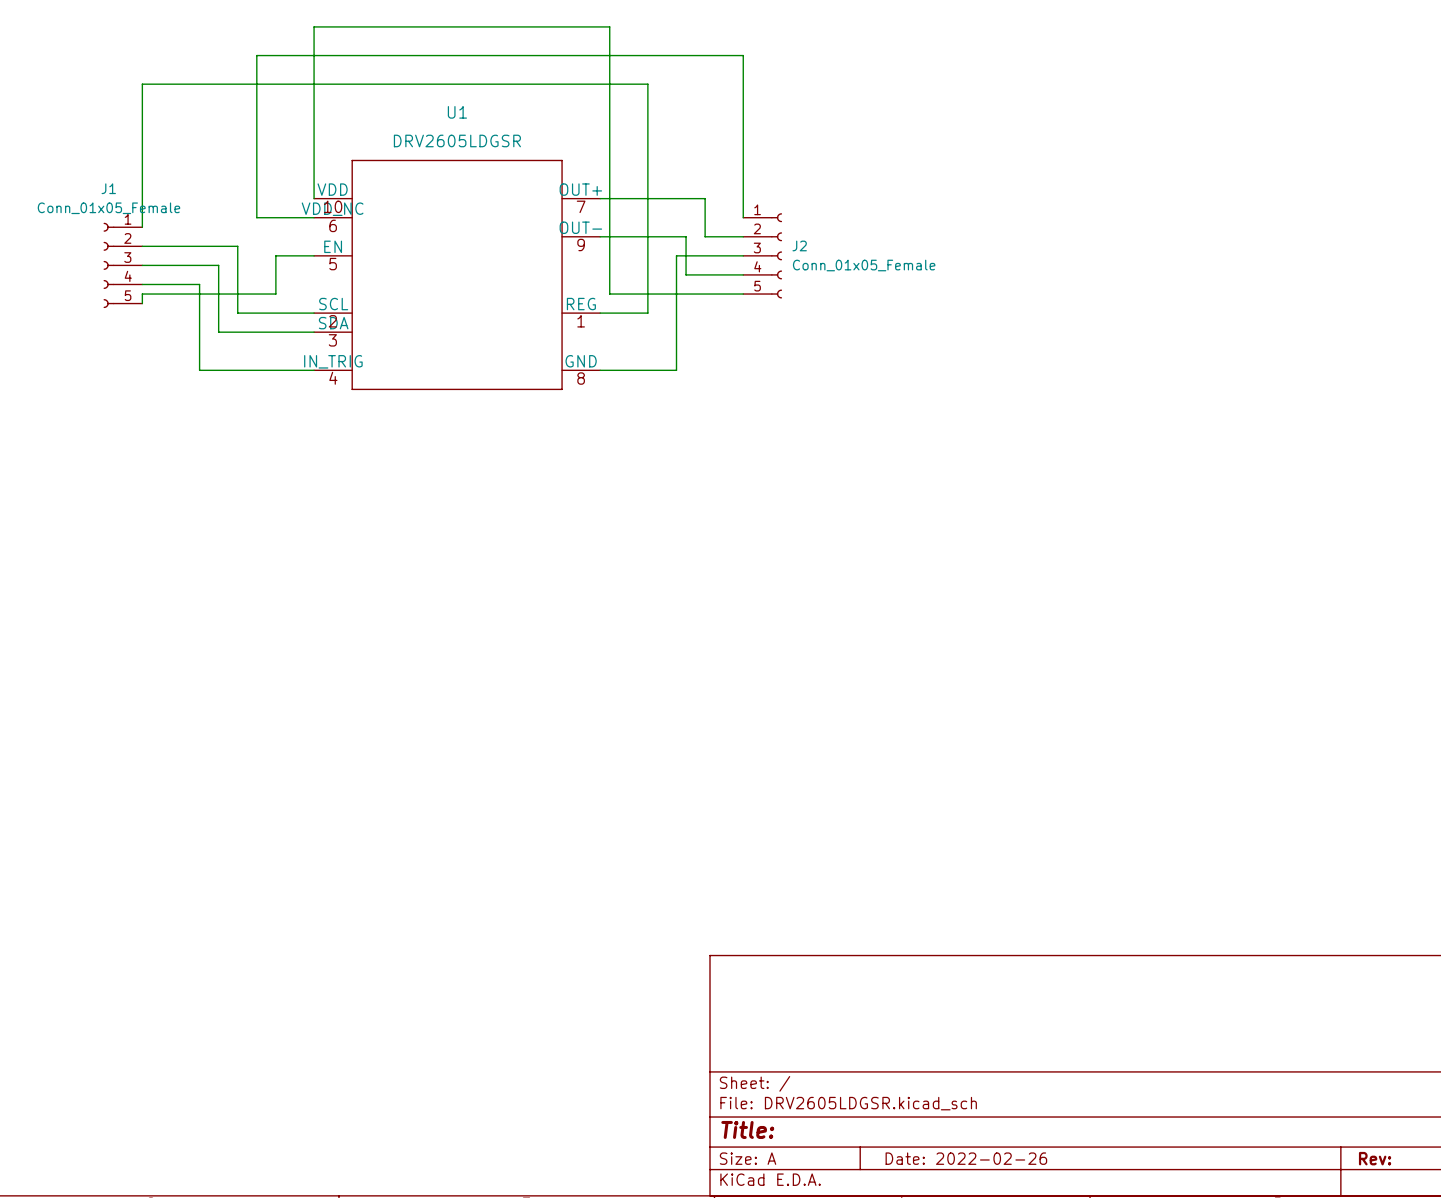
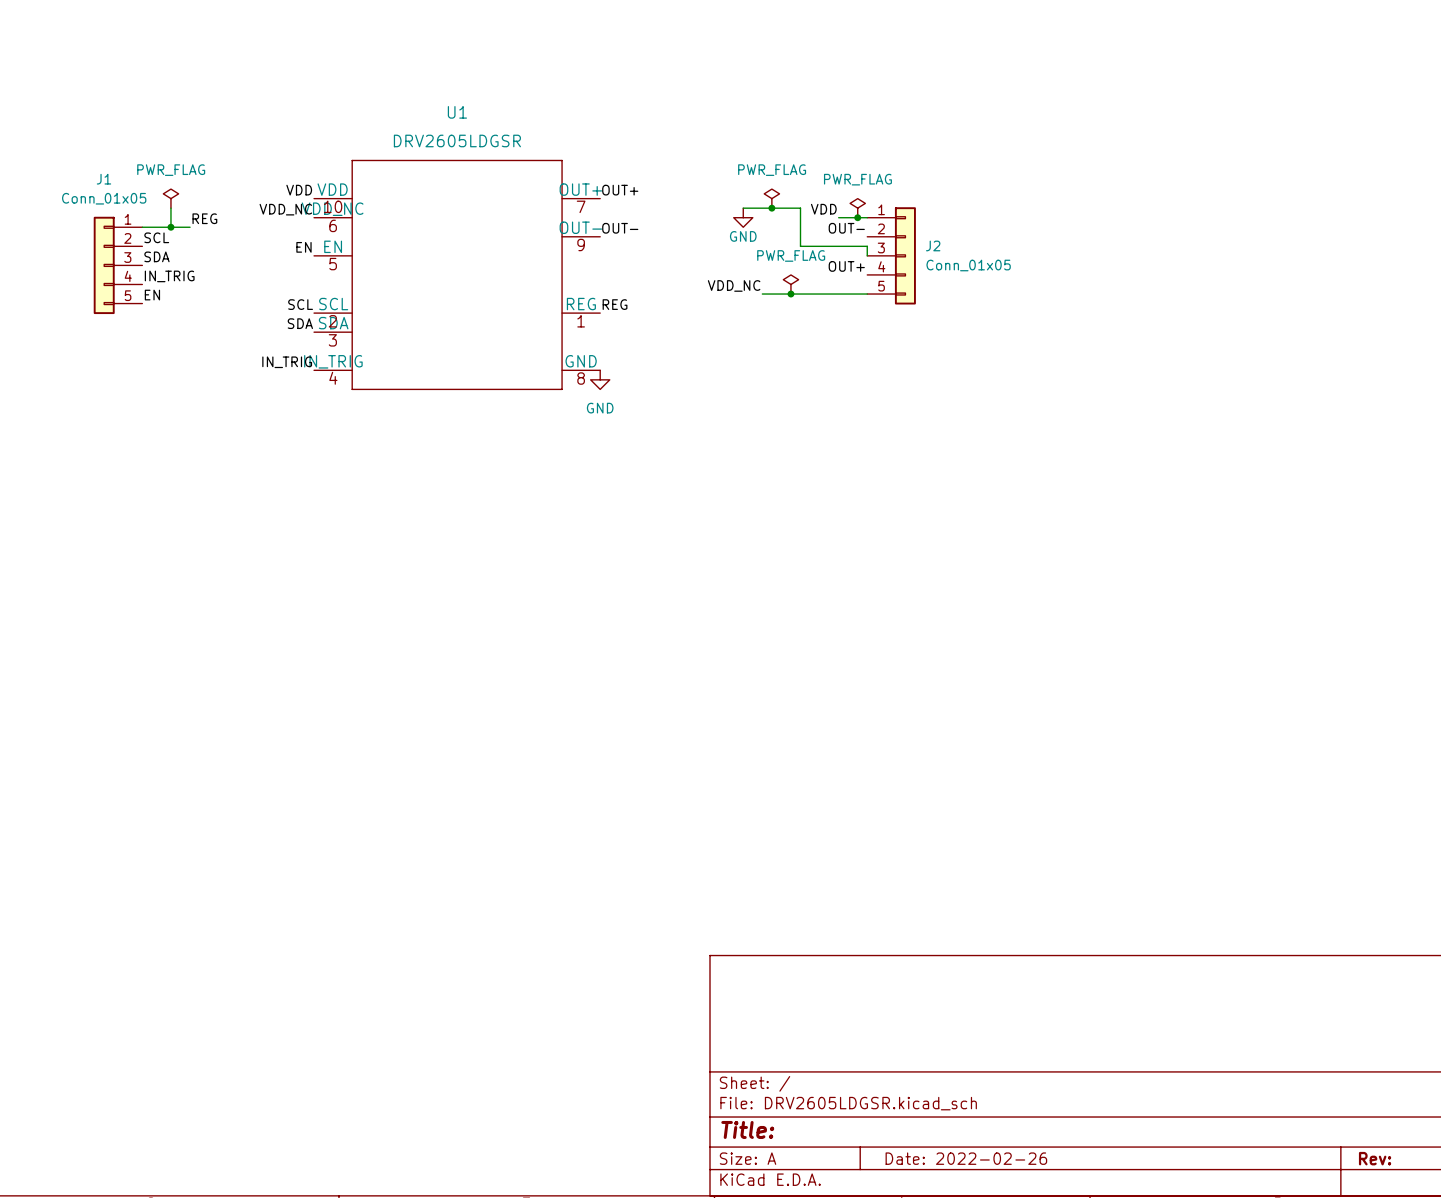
label: none -> VDD (299, 190)
label: none -> OUT+ (620, 190)
power symbol: none -> PWR_FLAG (170, 198)
wire: (314, 198) (314, 26) (609, 26) (609, 294) (743, 294) -> none
wire: (600, 198) (705, 198) (705, 236) (743, 236) -> none
power symbol: none -> PWR_FLAG (771, 198)
J1 value: Conn_01x05_Female (108, 208) -> Conn_01x05 (104, 198)
wire: none -> (170, 208) (170, 227)
wire: none -> (743, 208) (800, 208) (800, 246) (867, 246) (867, 255)
junction: none -> (771, 208)
power symbol: none -> PWR_FLAG (857, 208)
label: none -> VDD_NC (285, 209)
label: none -> VDD (823, 209)
J2 symbol: [743, 213, 782, 299] -> [867, 207, 916, 305]
wire: (314, 217) (256, 217) (256, 55) (743, 55) (743, 217) -> none
power symbol: none -> GND (743, 217)
wire: none -> (838, 217) (867, 217)
junction: none -> (857, 217)
label: none -> REG (204, 218)
J1 symbol: [103, 222, 143, 308] -> [93, 216, 143, 315]
wire: (142, 227) (142, 84) (647, 84) (647, 313) (600, 313) -> (142, 227) (190, 227)
junction: none -> (170, 227)
label: none -> OUT- (620, 228)
label: none -> OUT- (846, 228)
wire: (600, 236) (686, 236) (686, 274) (743, 274) -> none
label: none -> SCL (156, 237)
wire: (142, 246) (237, 246) (237, 313) (314, 313) -> none
label: none -> EN (303, 247)
wire: (314, 255) (275, 255) (275, 294) (142, 294) (142, 303) -> none
wire: (743, 255) (676, 255) (676, 370) (600, 370) -> none
label: none -> SDA (156, 256)
wire: (142, 265) (218, 265) (218, 332) (314, 332) -> none
J2 value: Conn_01x05_Female (864, 265) -> Conn_01x05 (968, 265)
label: none -> OUT+ (846, 266)
label: none -> IN_TRIG (169, 276)
wire: (142, 284) (199, 284) (199, 370) (314, 370) -> none
power symbol: none -> PWR_FLAG (790, 284)
label: none -> VDD_NC (734, 285)
wire: none -> (762, 294) (867, 294)
junction: none -> (790, 294)
label: none -> EN (152, 295)
label: none -> SCL (300, 304)
label: none -> REG (615, 304)
label: none -> SDA (300, 323)
label: none -> IN_TRIG (287, 362)
power symbol: none -> GND (600, 379)

